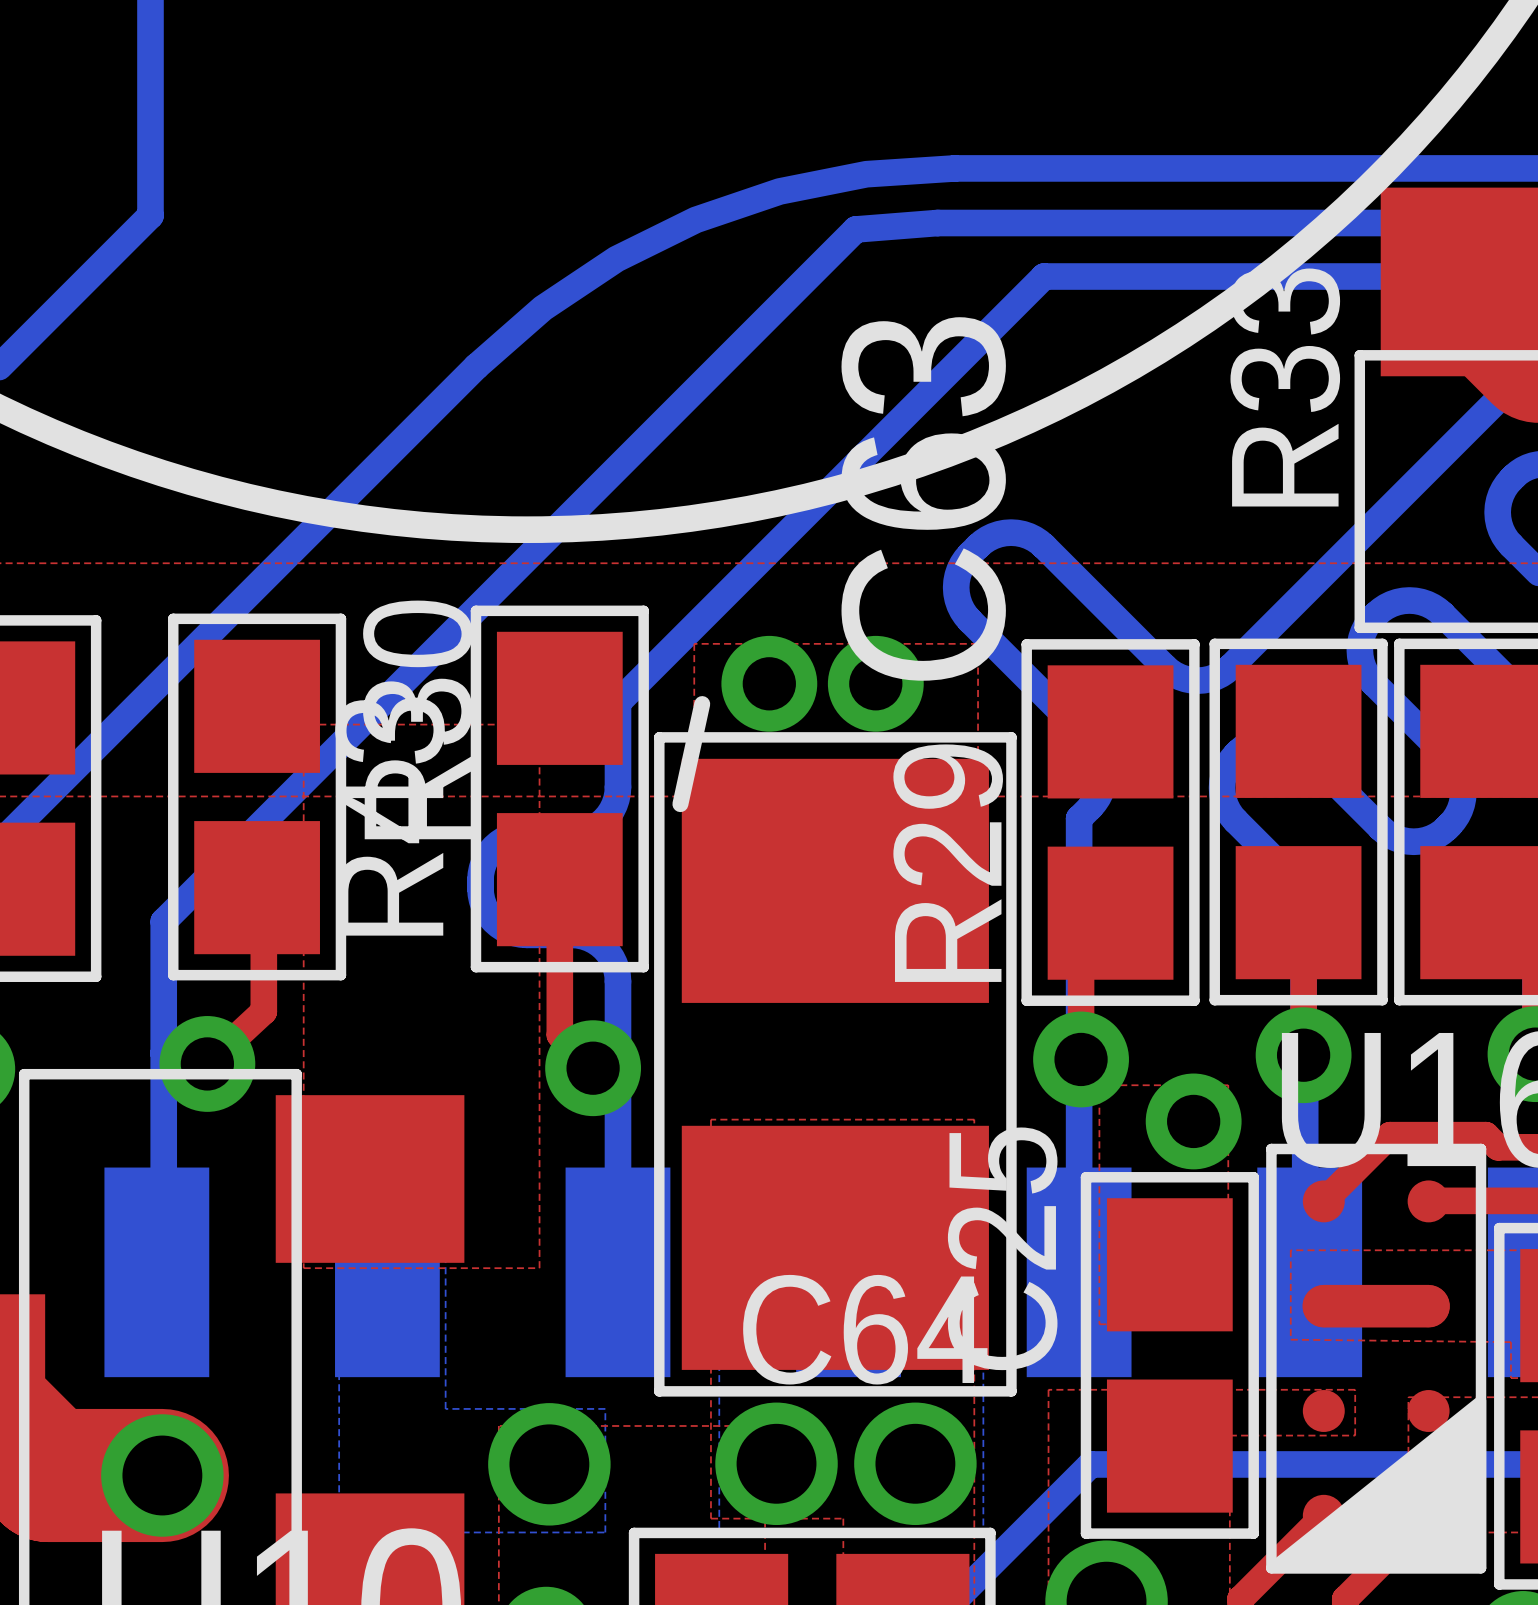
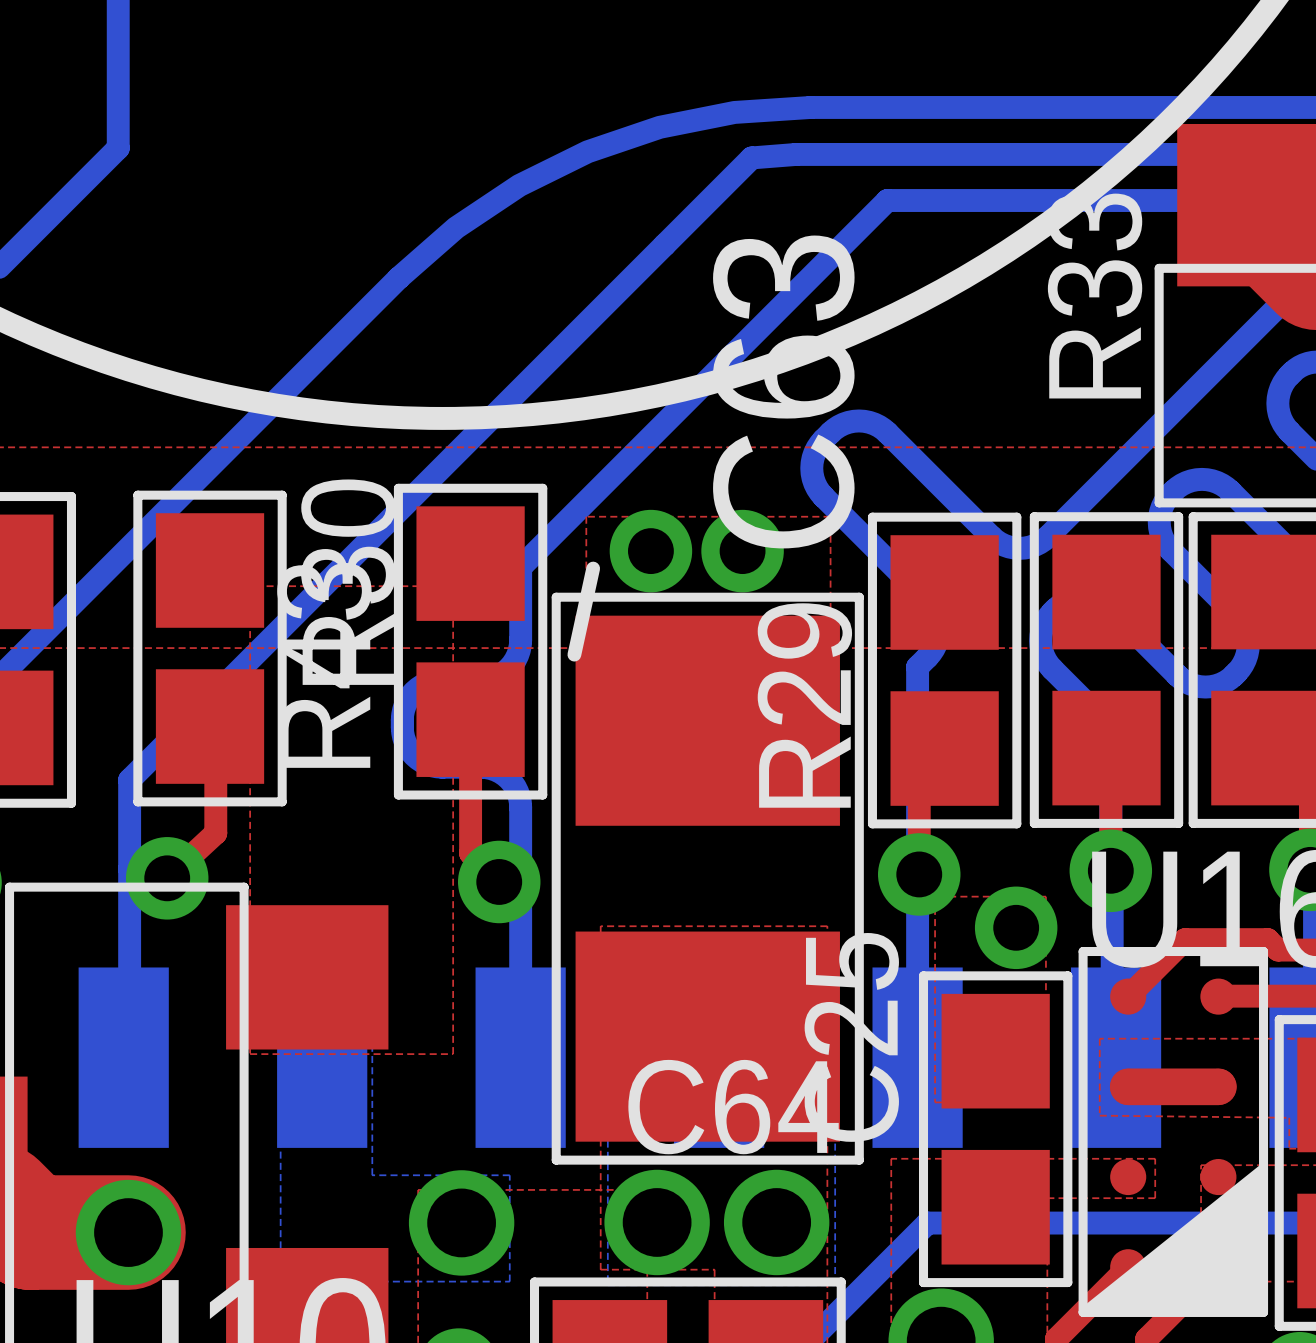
bottom track: (886, 227) (855, 229) (163, 921) (163, 949) -> (751, 157) (129, 780)

